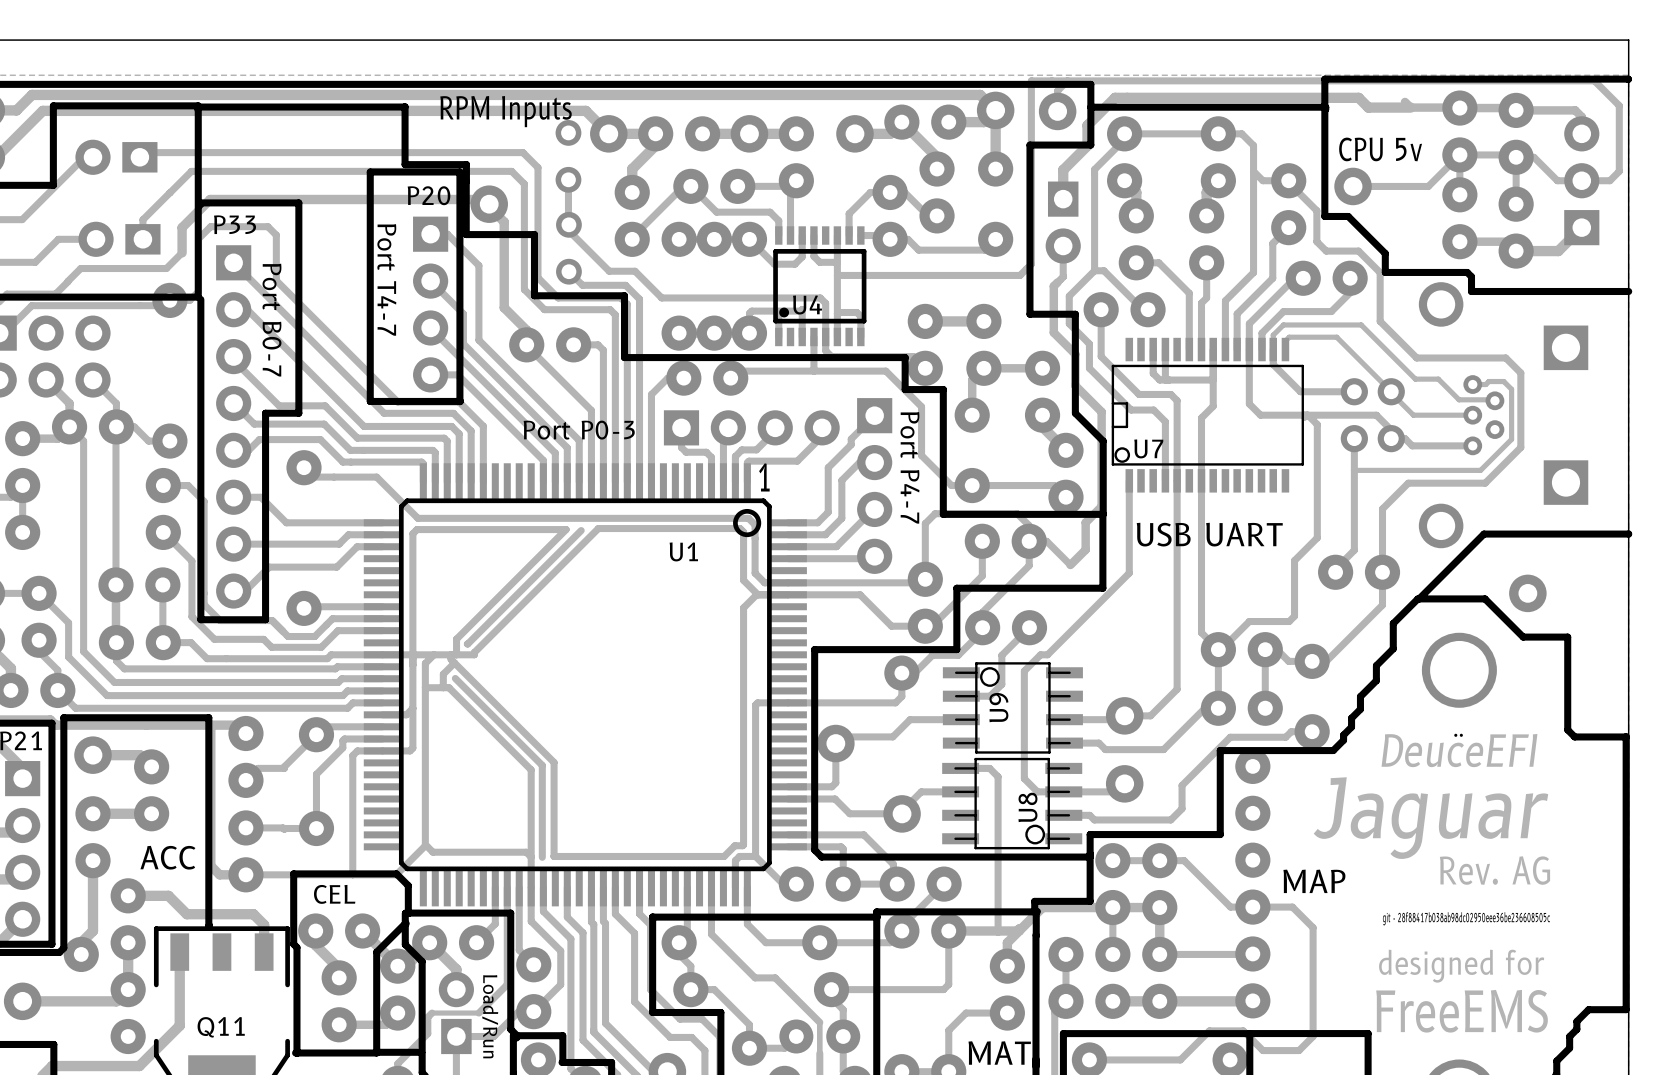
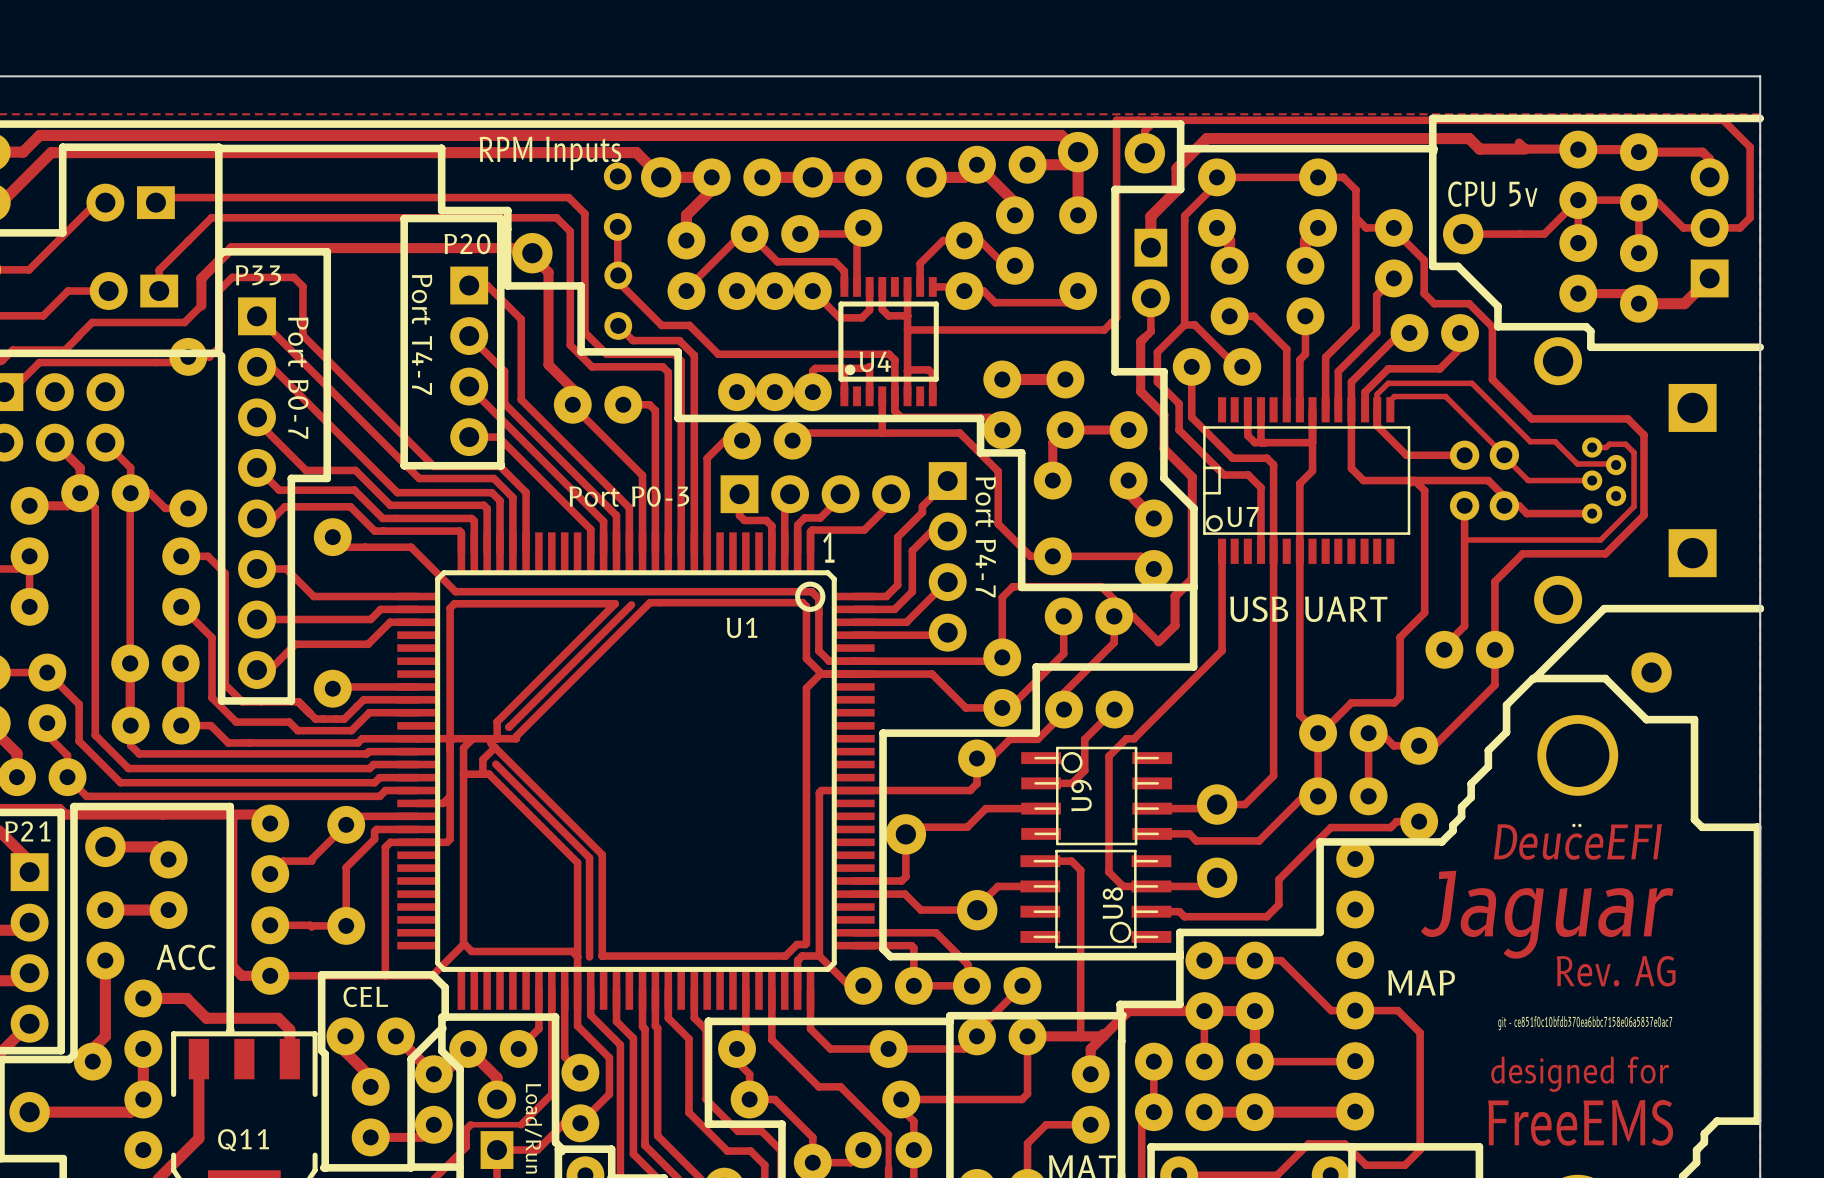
text: git - 28f88417b038ab98dc02950eee36be236608505c (1466, 918) -> git - ce851f0c10bfdb370ea6bbc7158e06a5837e0ac7 (1585, 1023)

